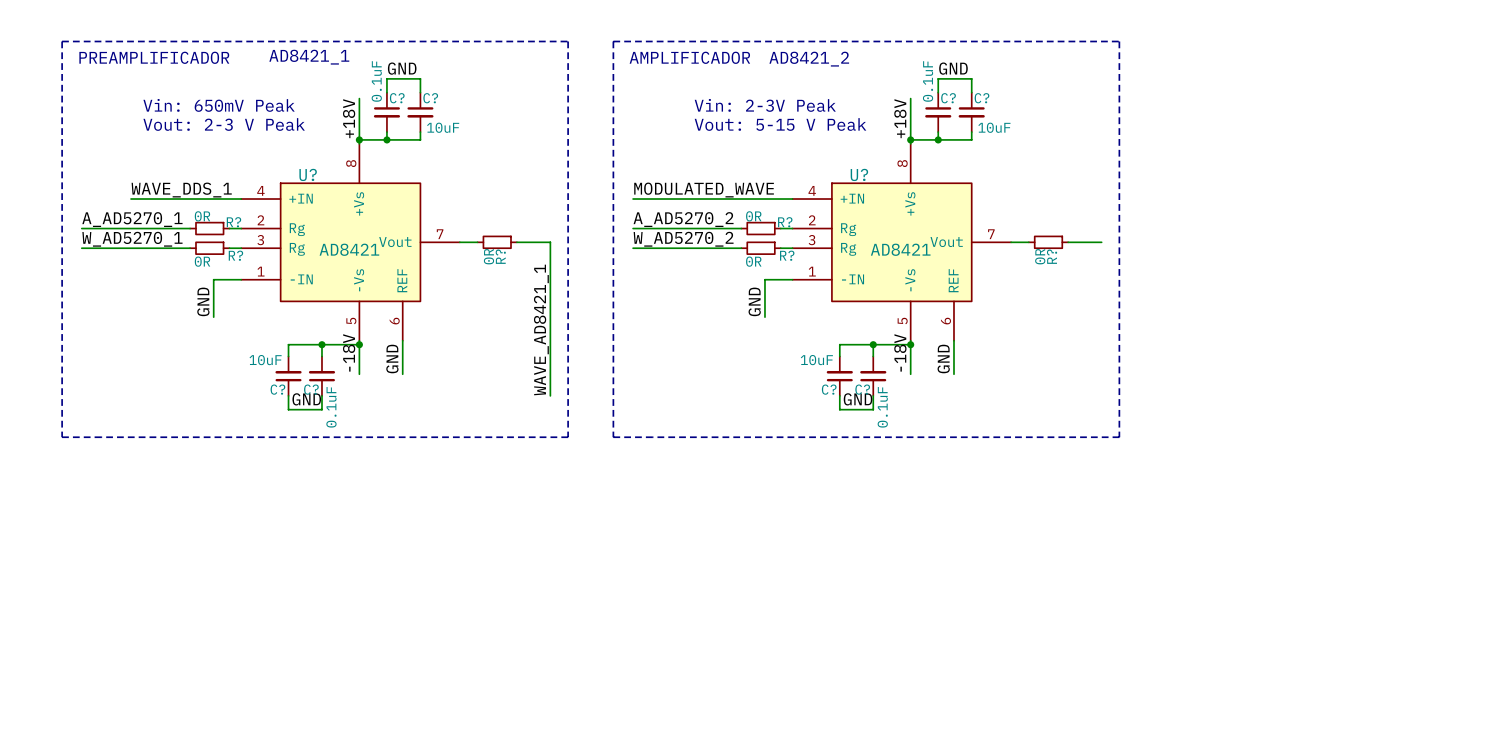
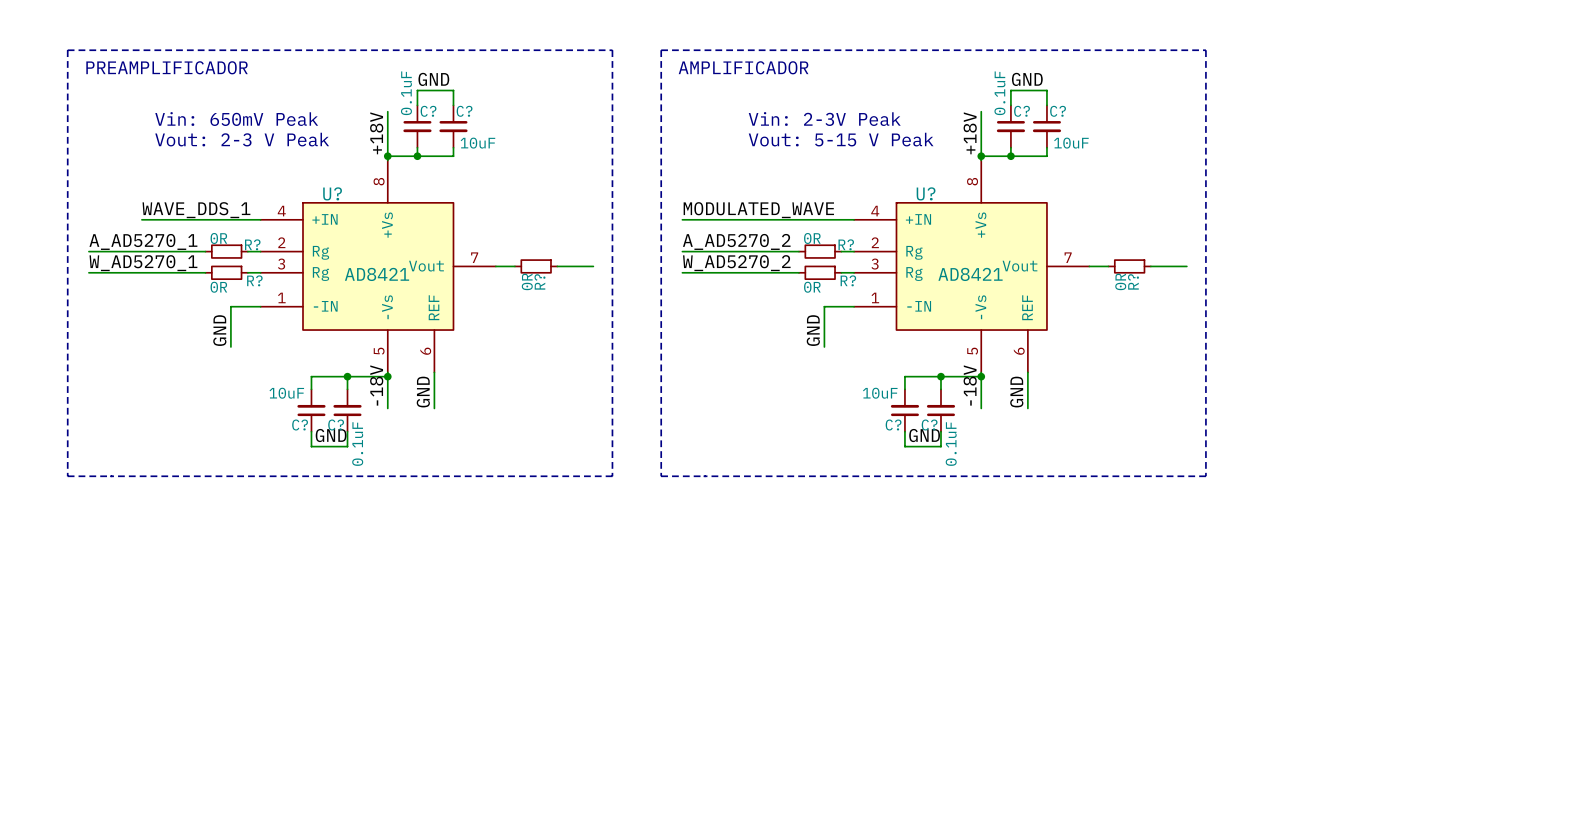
text: AD8421_1 (309, 57) -> none
text: AD8421_2 (809, 59) -> none
wire: (550, 242) (550, 395) -> none
label: WAVE_AD8421_1 (541, 329) -> none

